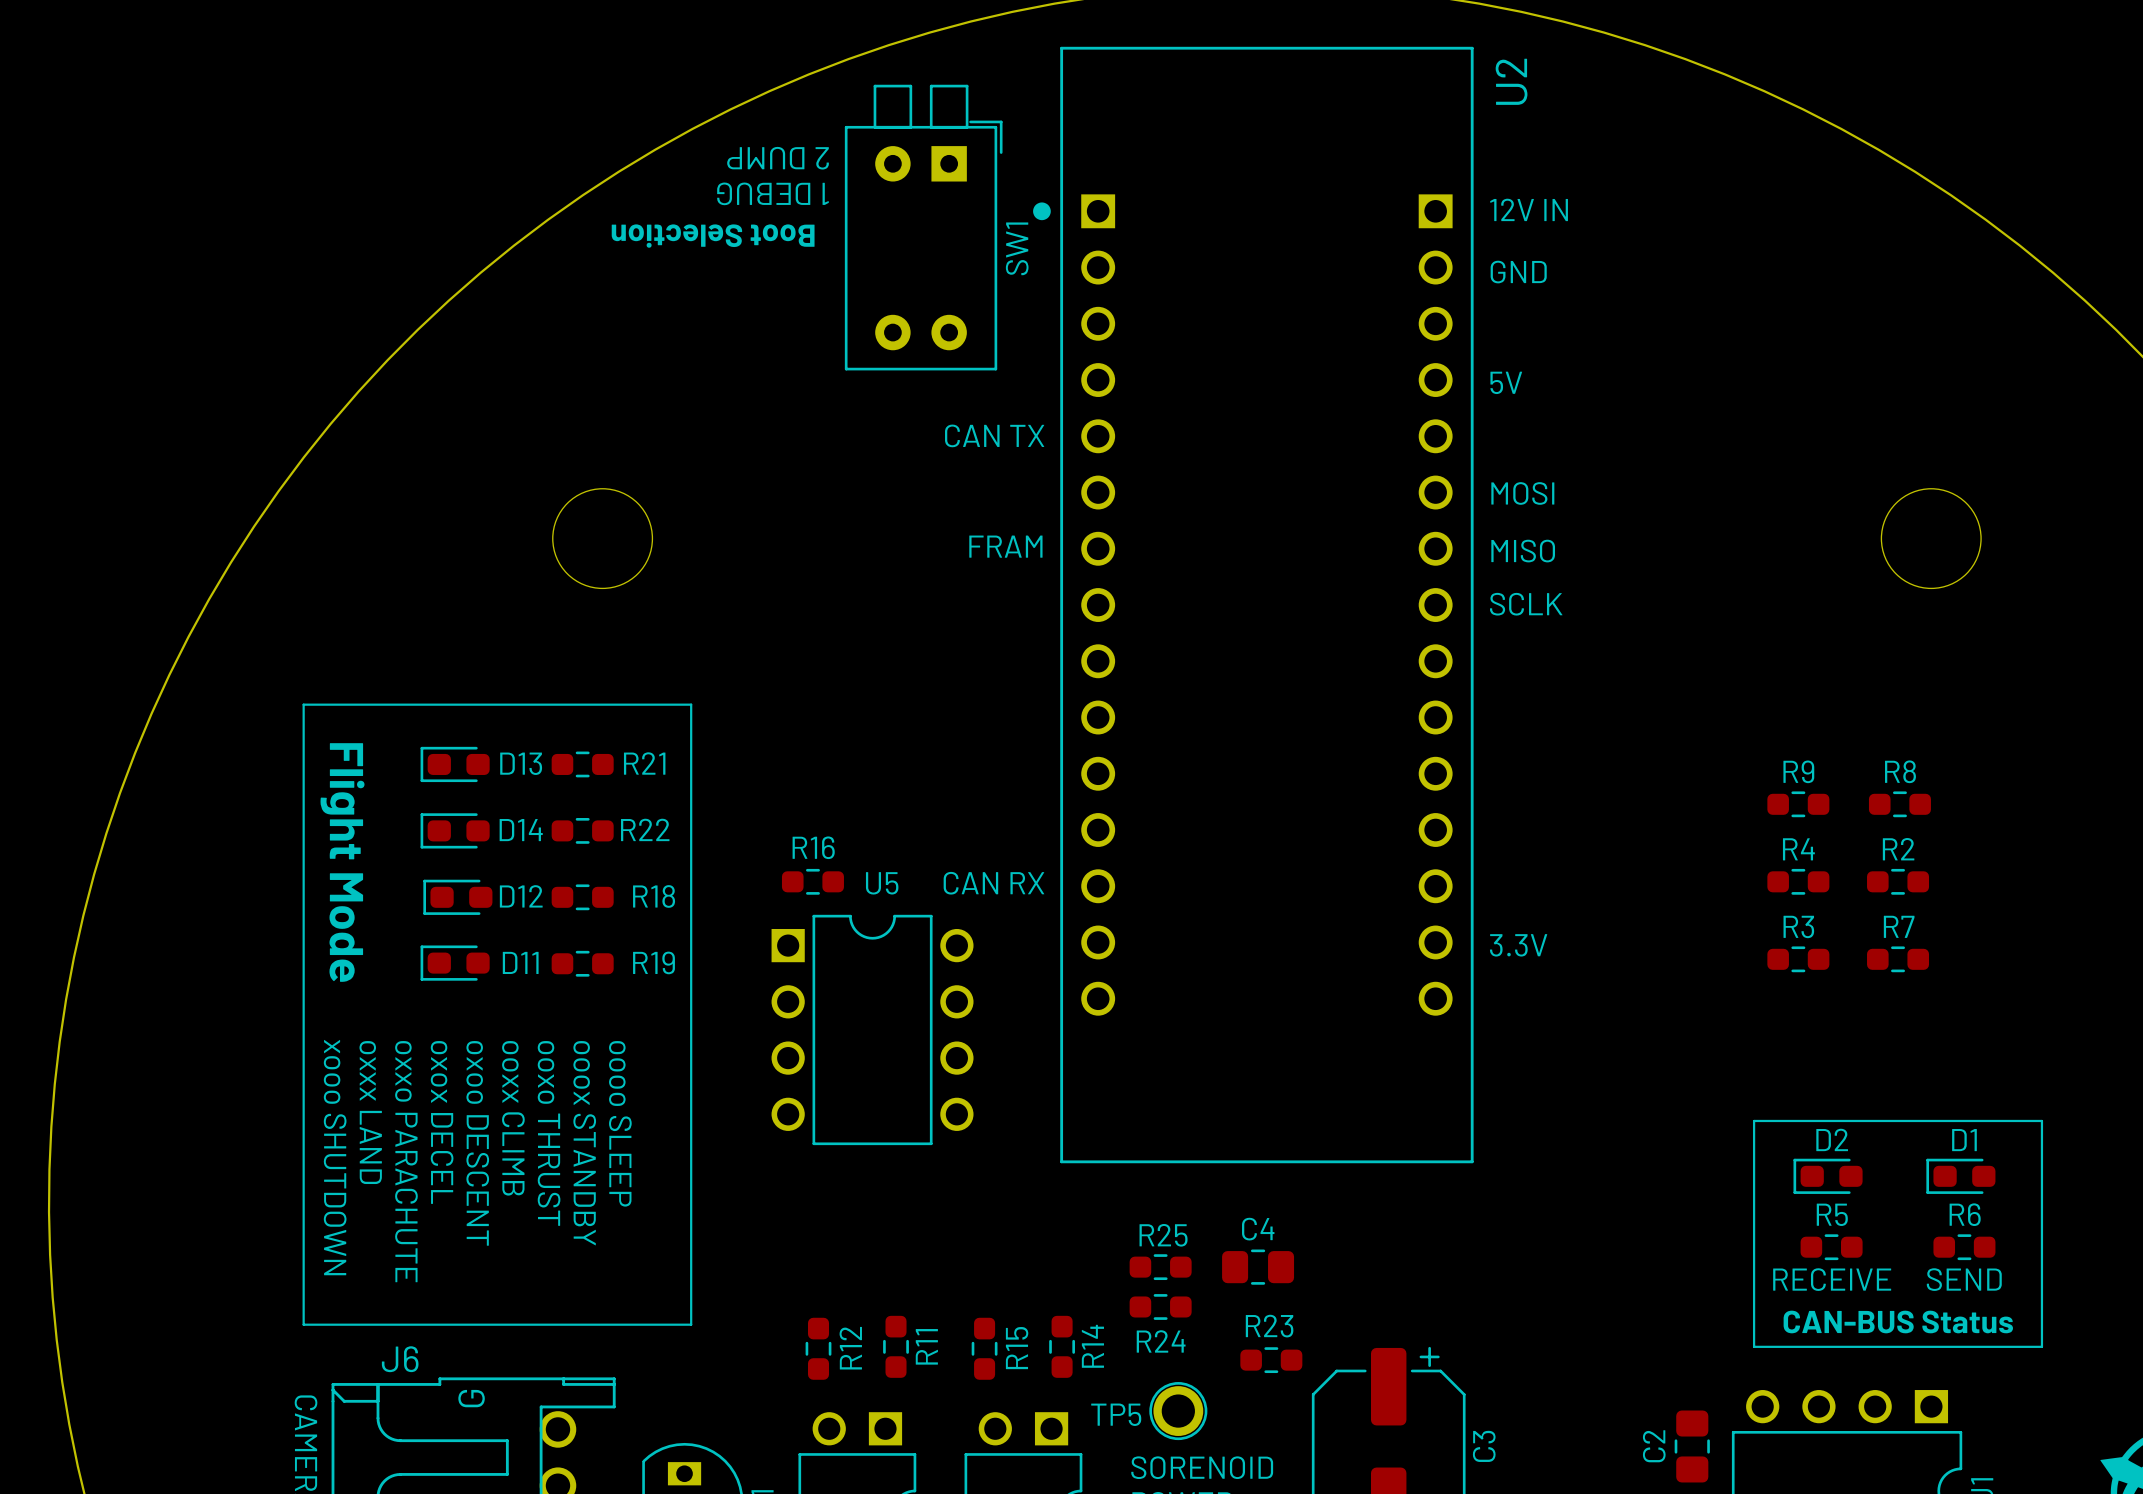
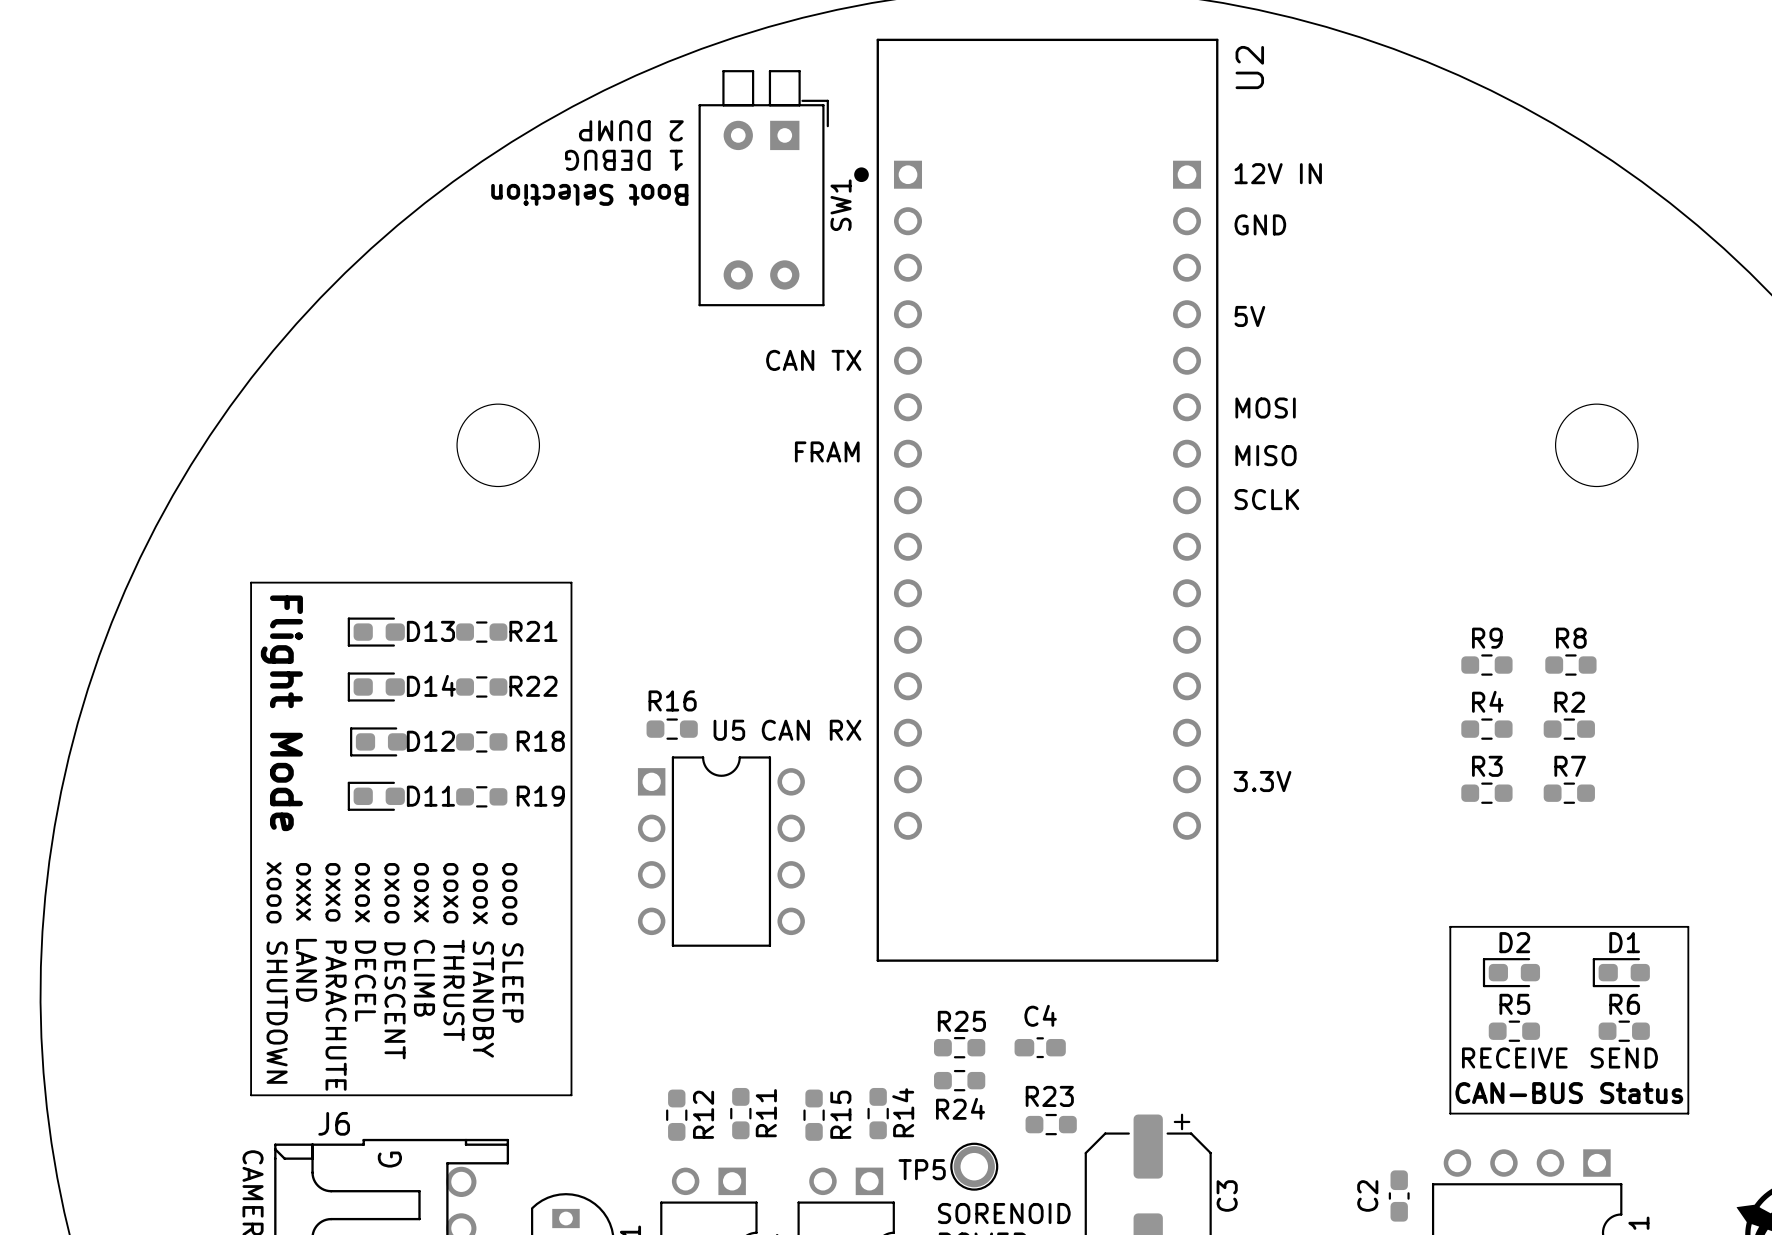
C4 footprint: [1222, 1249, 1295, 1285] -> [1014, 1037, 1066, 1059]
C2 footprint: [1674, 1410, 1710, 1483] -> [1388, 1170, 1410, 1222]

